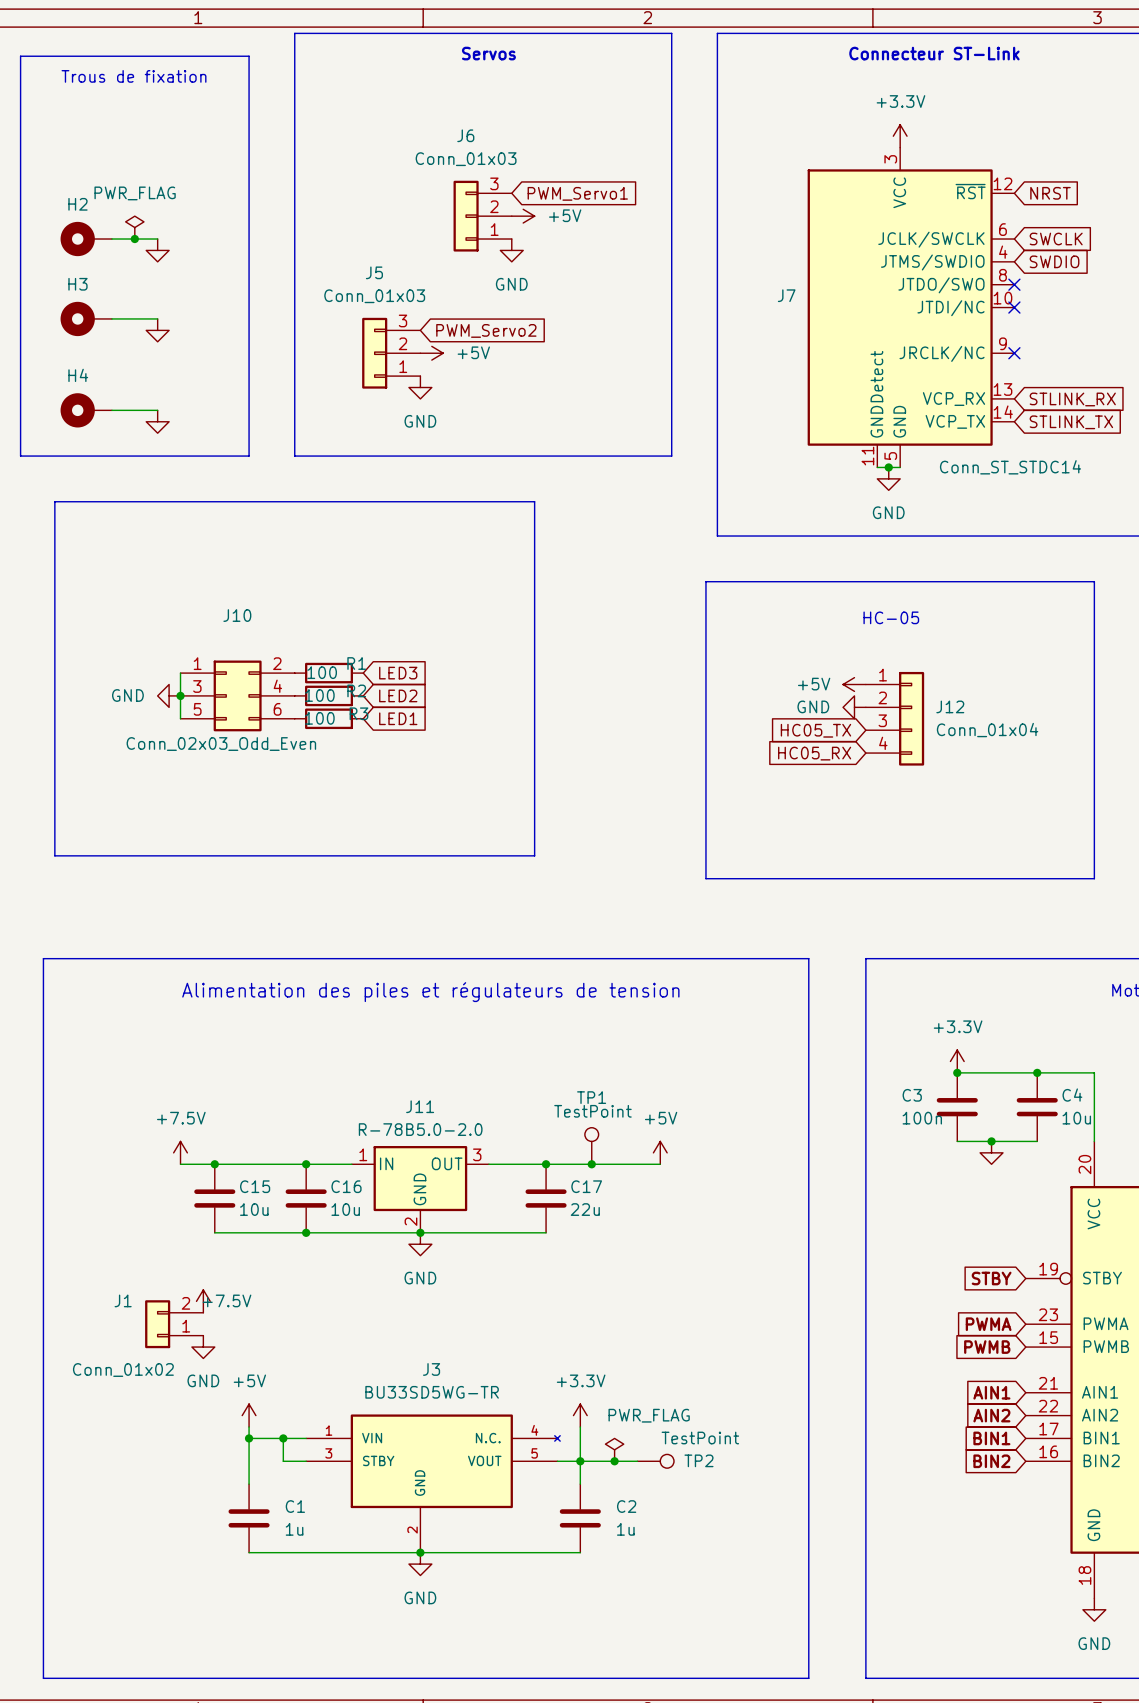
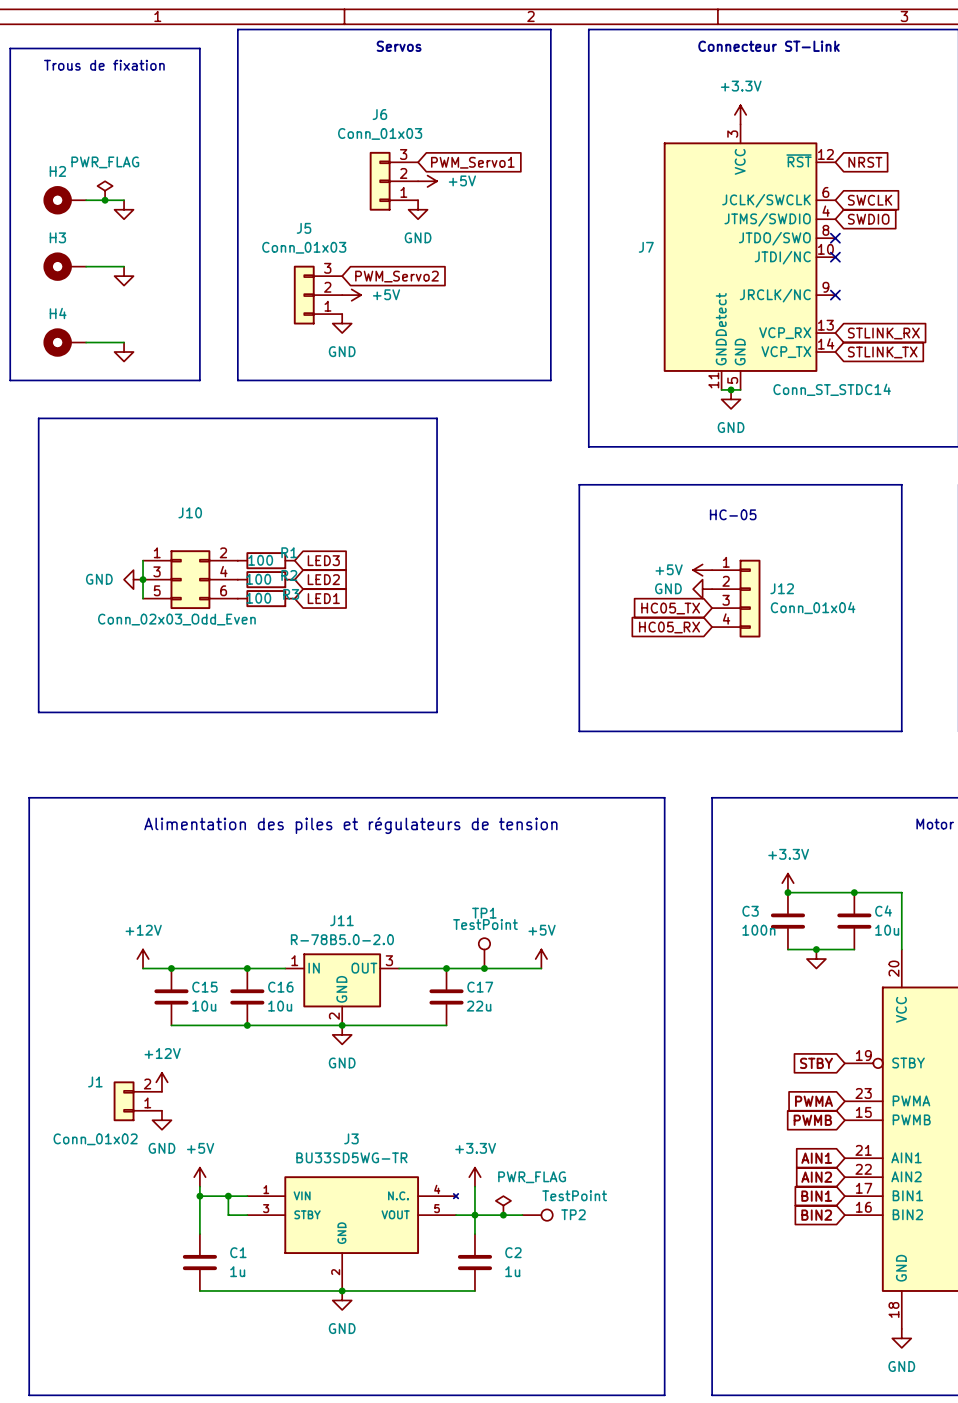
power symbol: +7.5V (180, 1152) -> +12V (143, 959)
power symbol: +7.5V (203, 1301) -> +12V (161, 1082)

